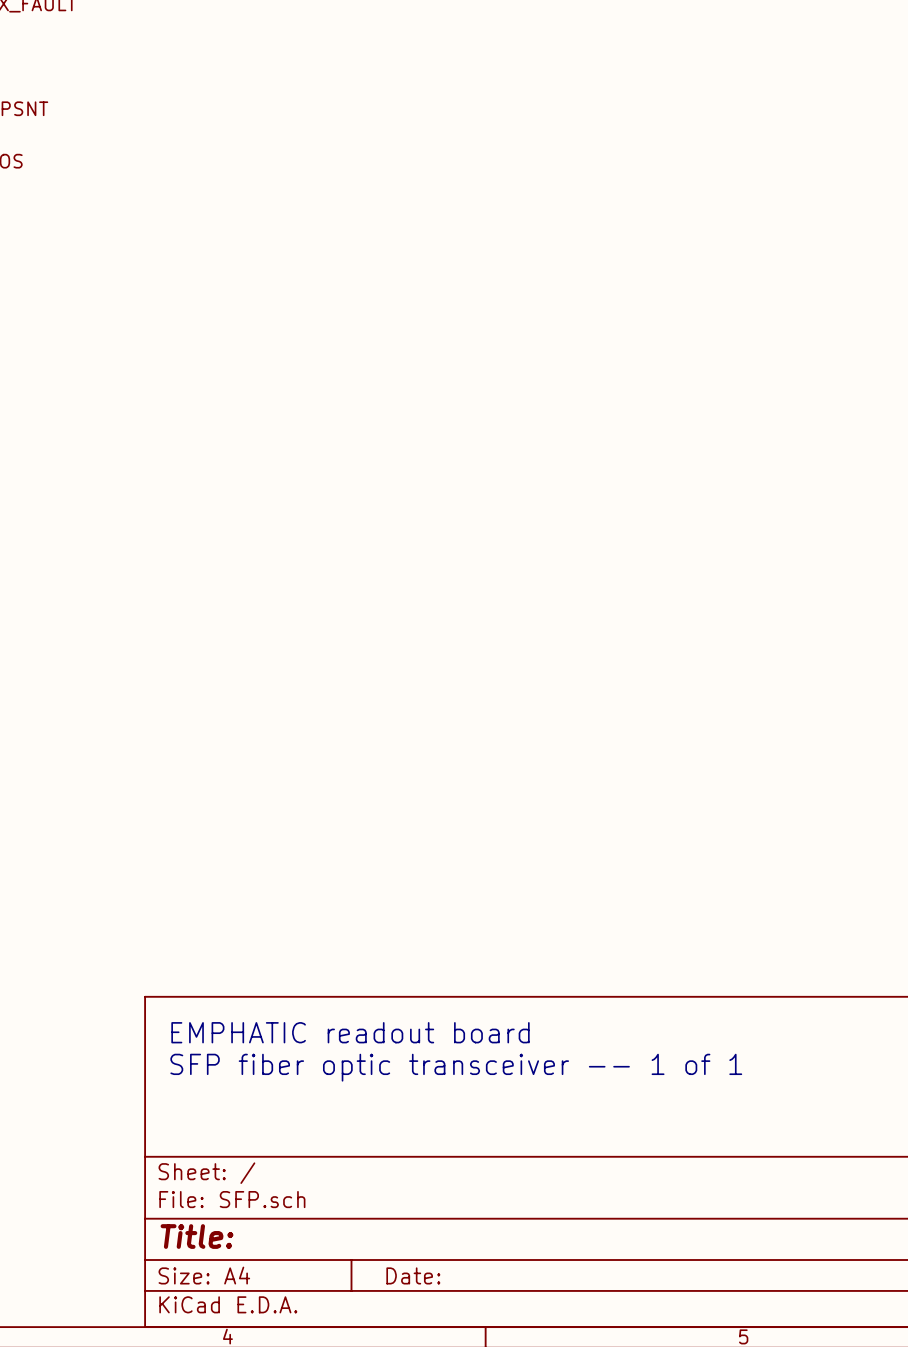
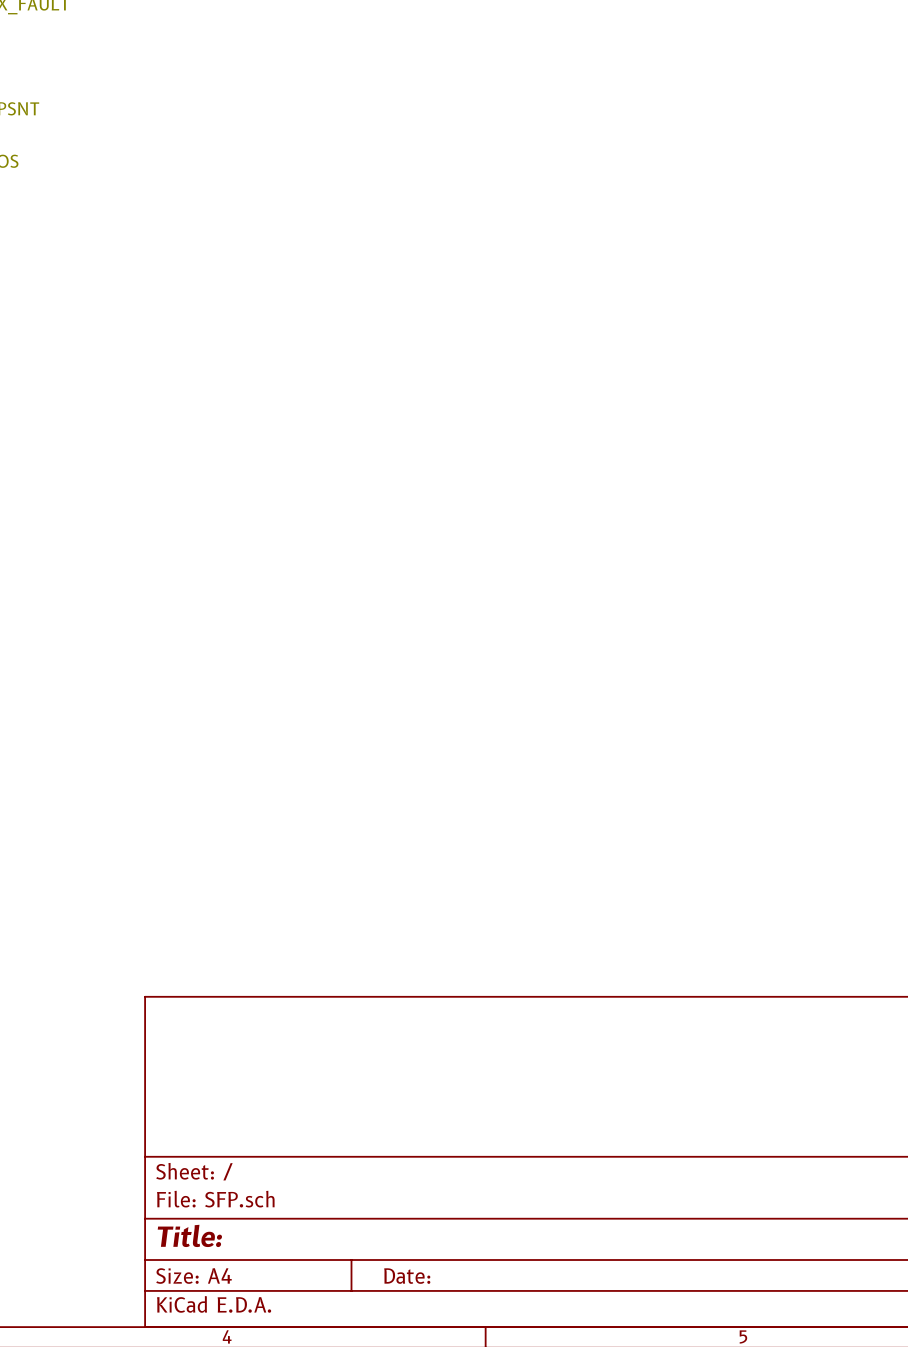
text: EMPHATIC readout board (350, 1032) -> none
text: SFP fiber optic transceiver -- 1 of 1 (456, 1067) -> none

